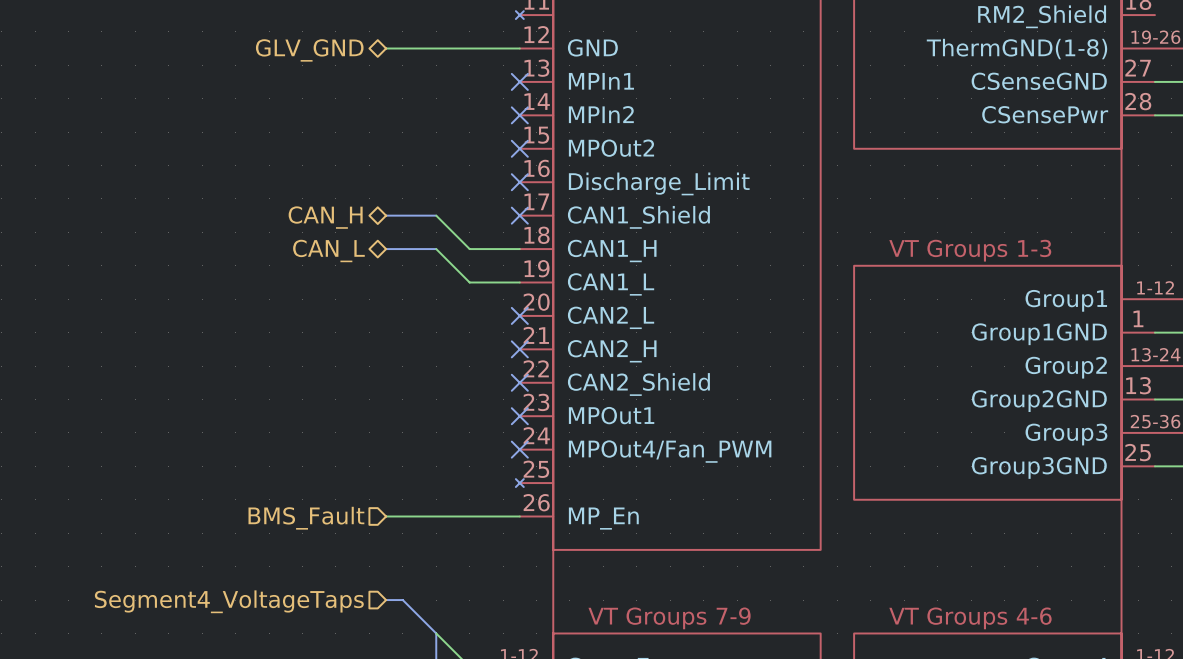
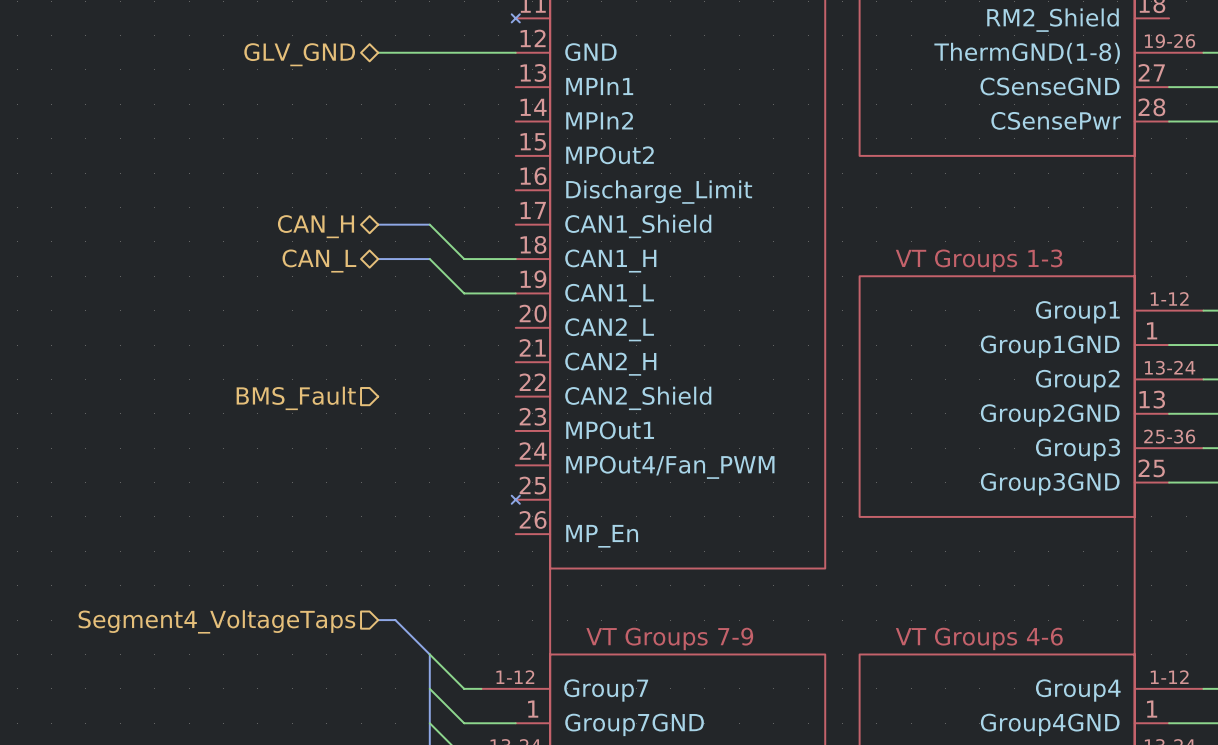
no-connect mark: (519, 81) -> none
no-connect mark: (519, 115) -> none
no-connect mark: (519, 148) -> none
no-connect mark: (519, 182) -> none
no-connect mark: (519, 215) -> none
no-connect mark: (519, 315) -> none
no-connect mark: (519, 349) -> none
no-connect mark: (519, 382) -> none
no-connect mark: (519, 416) -> none
no-connect mark: (519, 449) -> none
wire: (386, 516) (519, 516) -> none
hierarchical label position: BMS_Fault (306, 518) -> BMS_Fault (296, 398)

